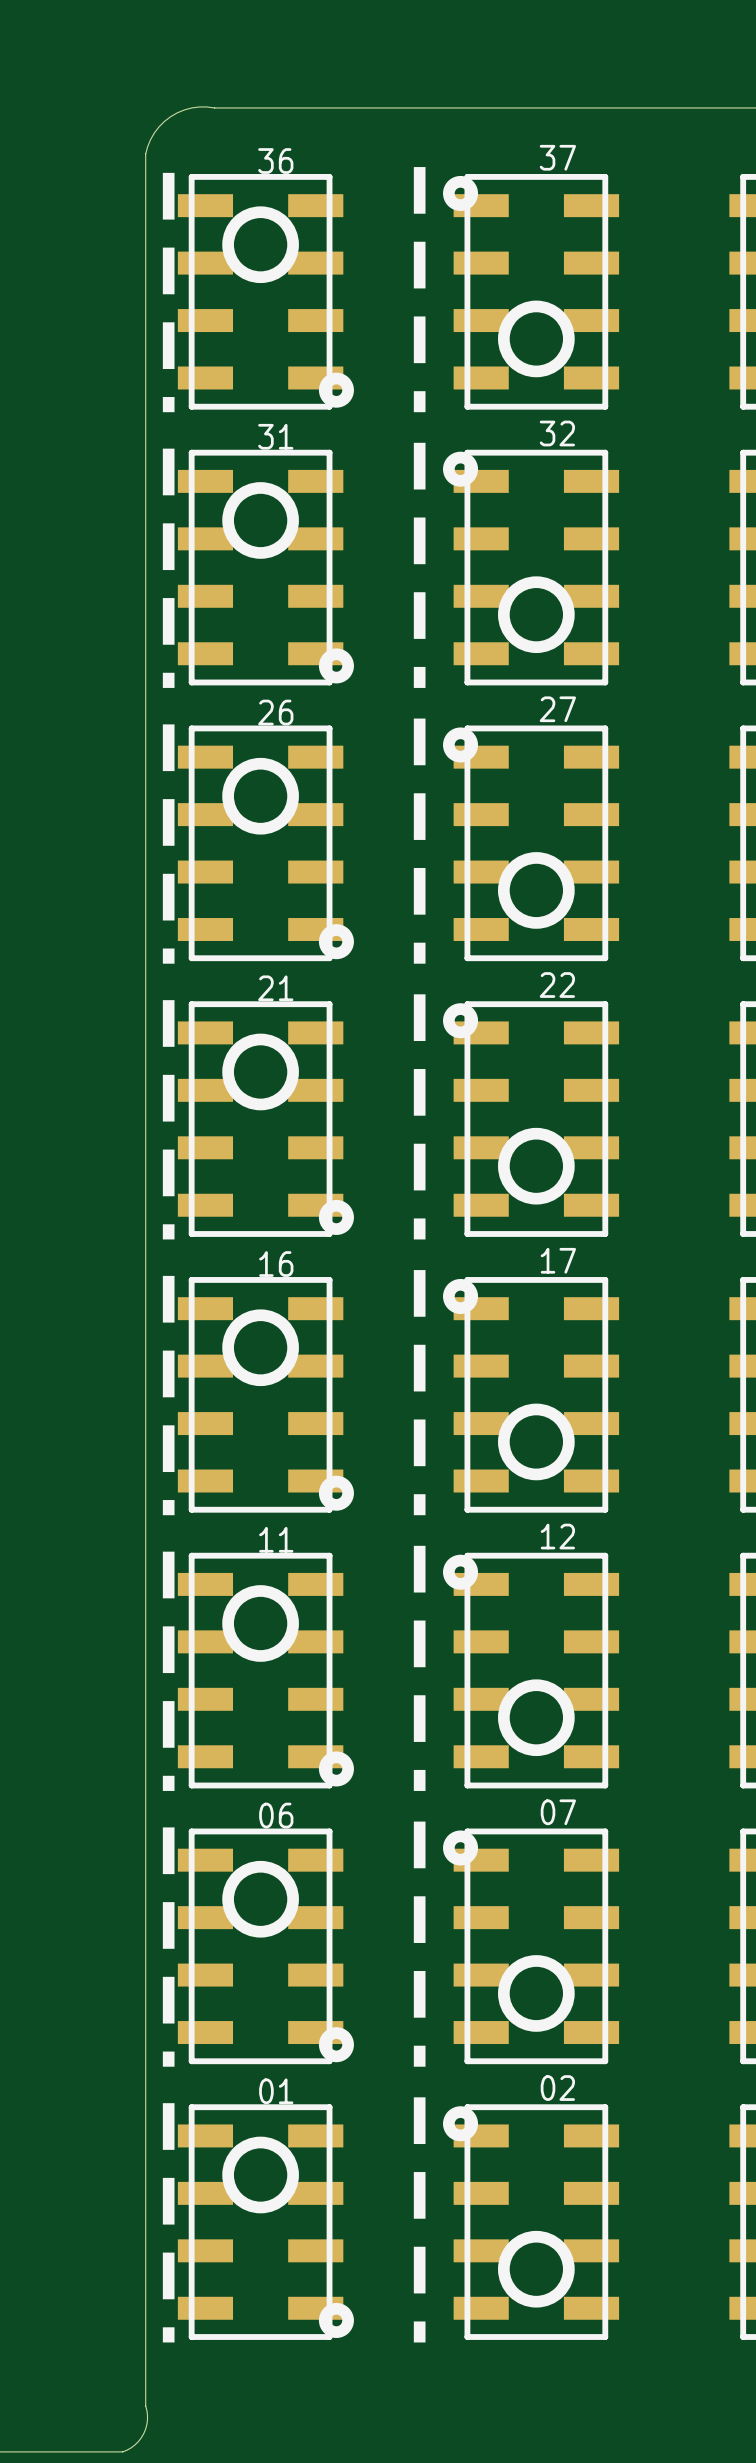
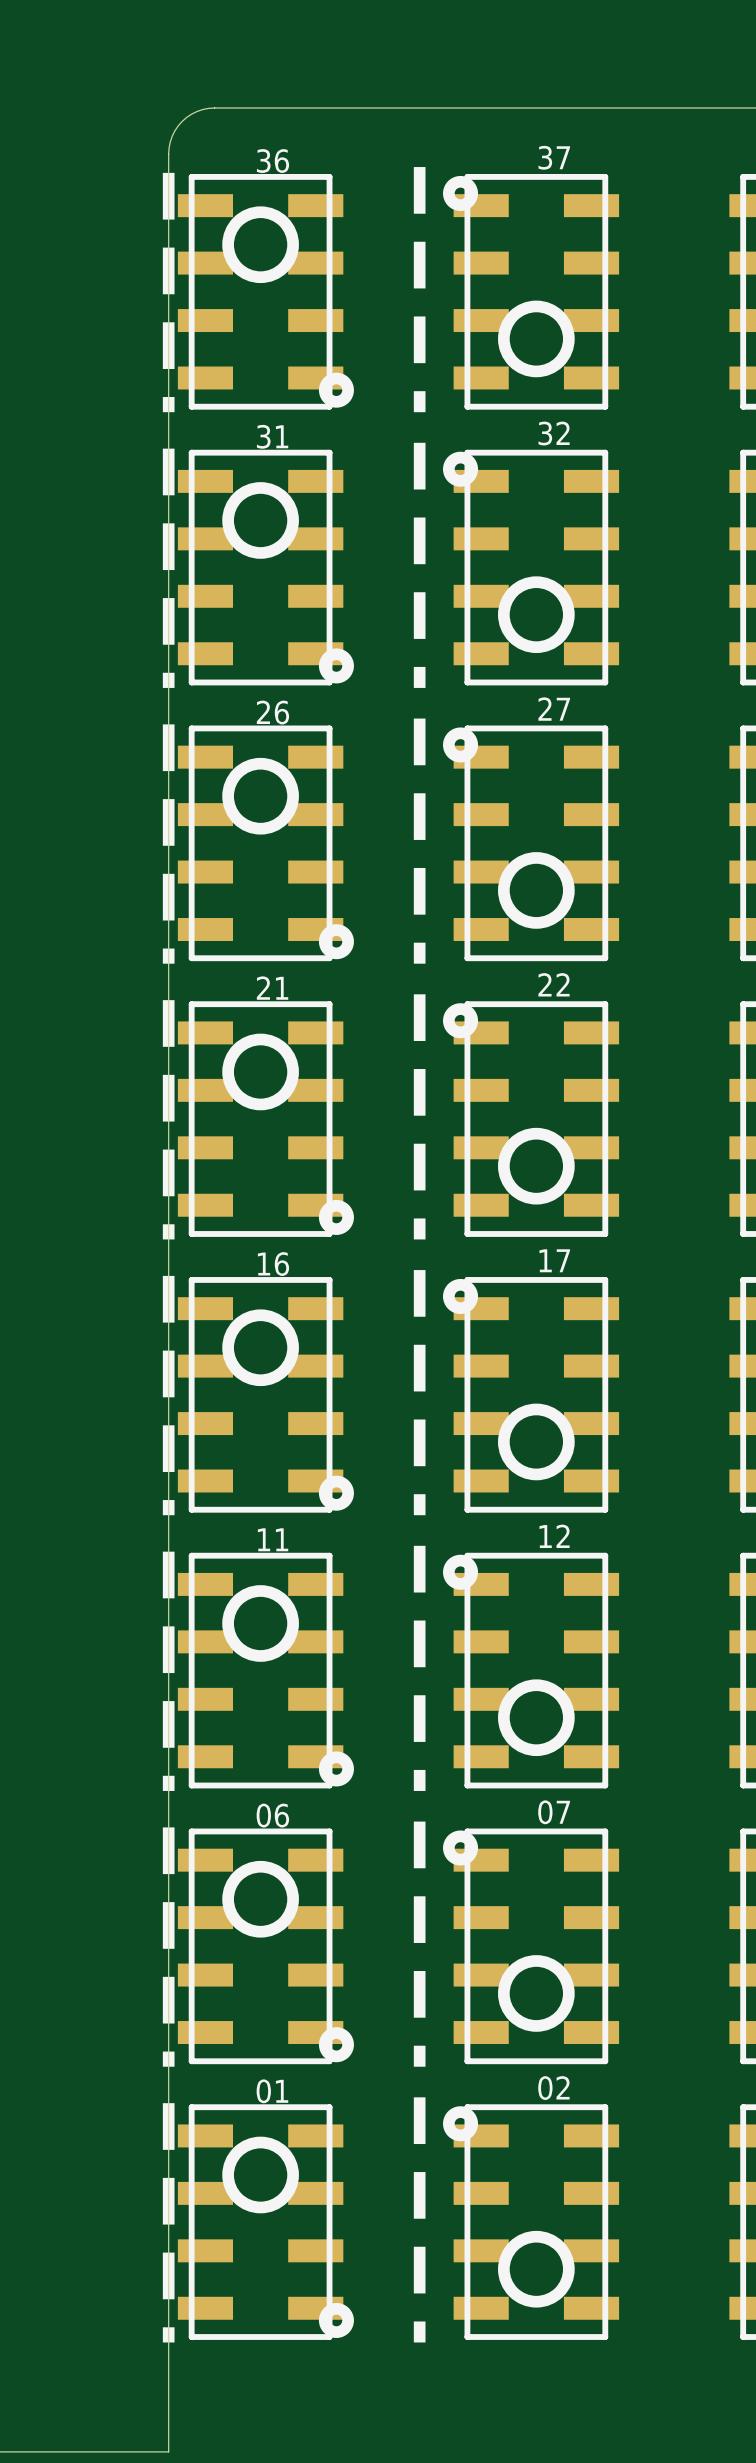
board edge: (214, 107) (191, 107) (170, 116) (154, 132) (145, 153) (145, 2405) (147, 2420) (143, 2433) (138, 2441) (122, 2451) -> (214, 107) (197, 111) (182, 121) (172, 136) (168, 153) (168, 2451) (122, 2451)

